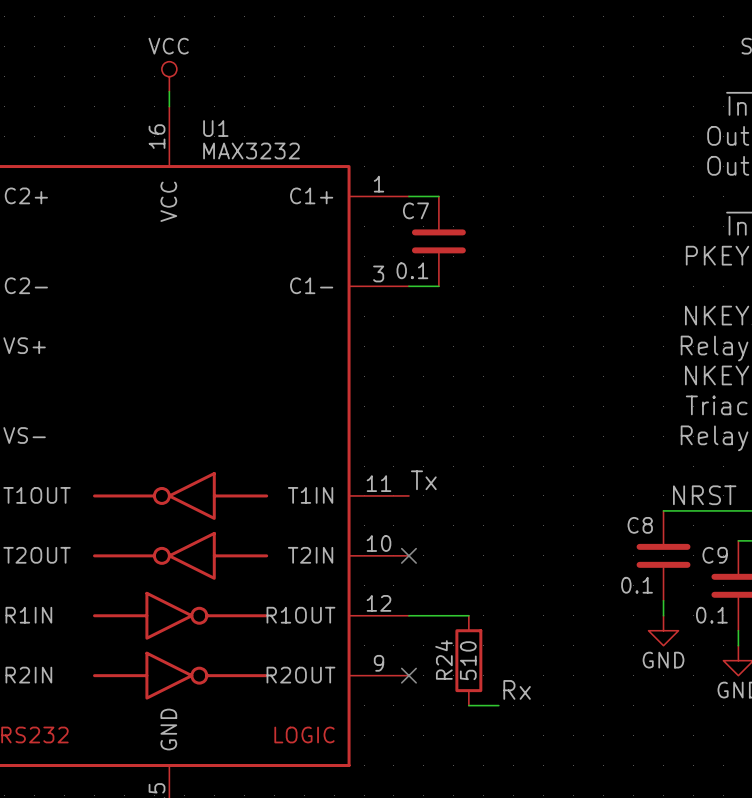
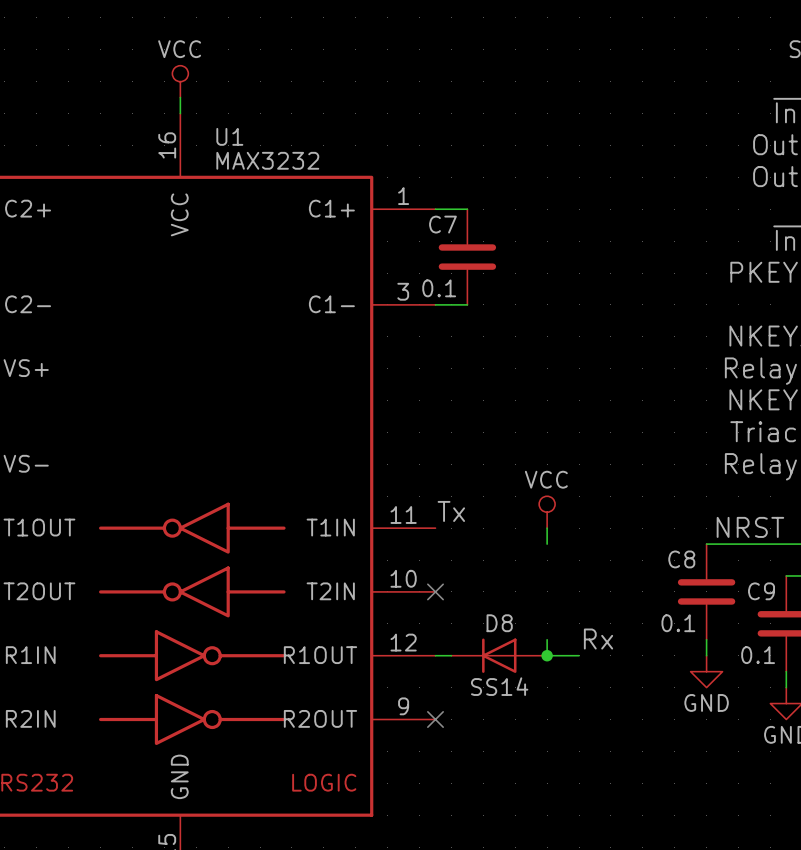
power symbol: none -> VCC (547, 512)
wire: none -> (547, 528) (547, 544)
wire: none -> (547, 639) (547, 655) (579, 655)
D8: none -> SS14 (499, 655)
junction: none -> (547, 655)
R24: 510 (468, 660) -> none
label position: Rx (517, 689) -> Rx (598, 639)
wire: (468, 705) (498, 705) -> none

